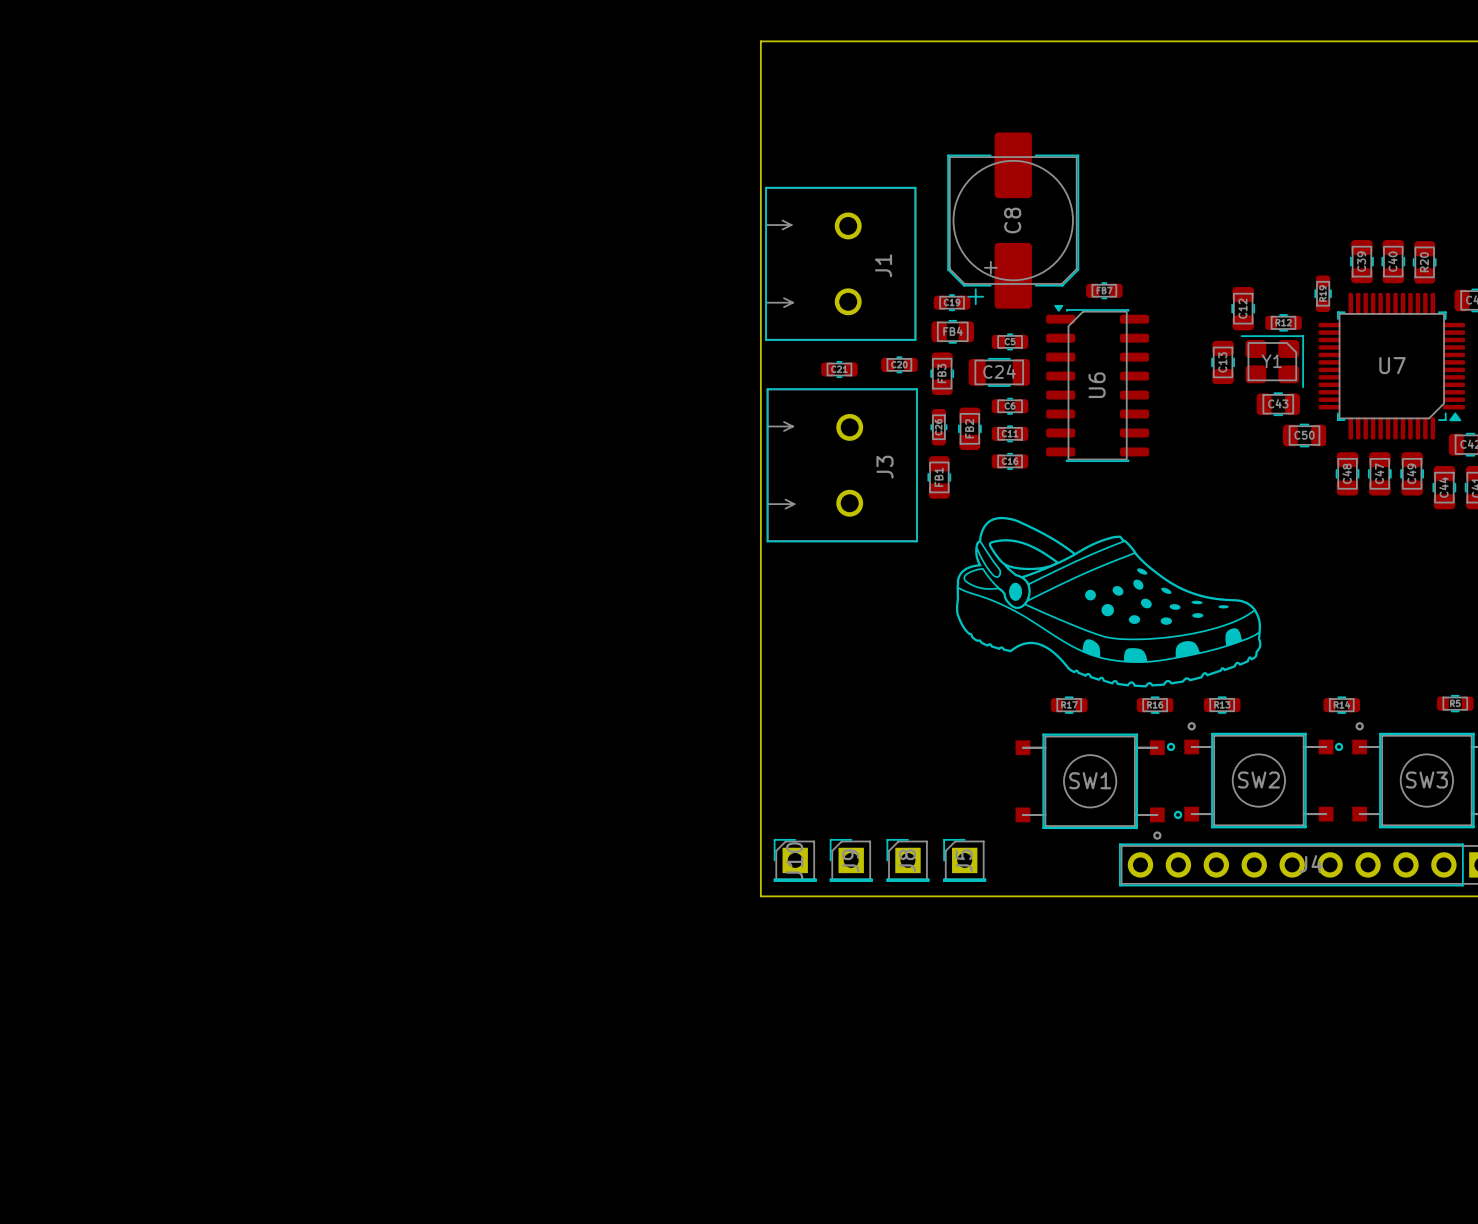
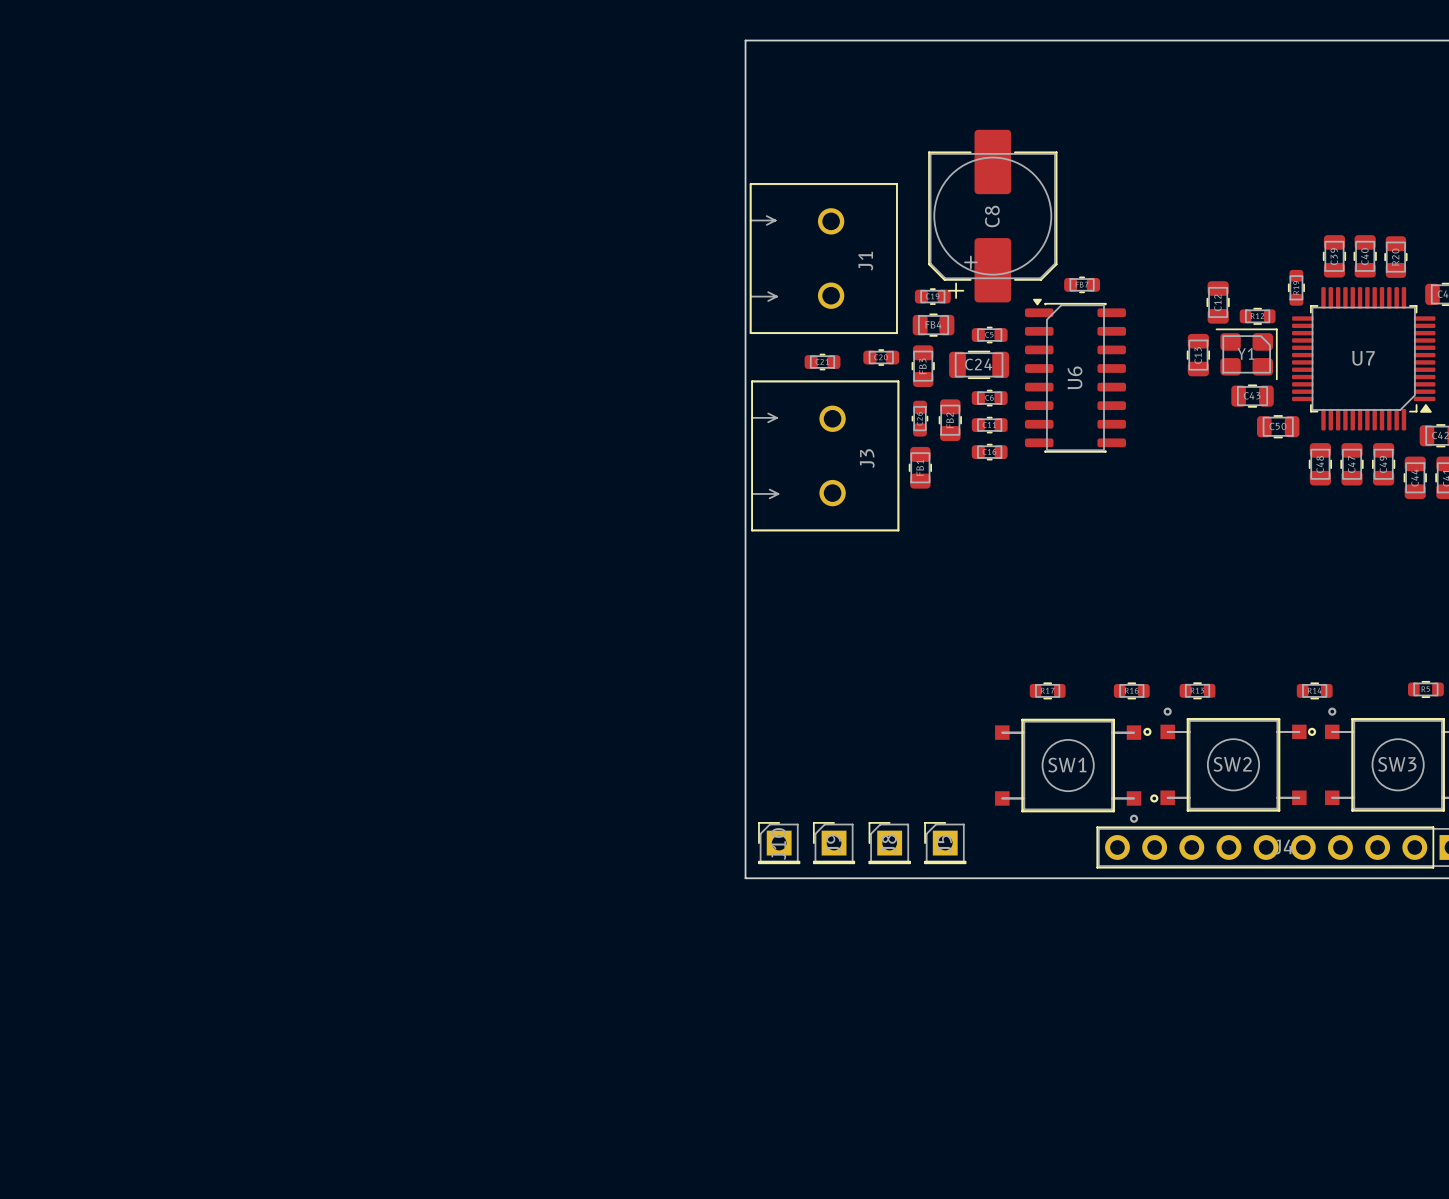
drawing: [955, 516, 1262, 688] -> none

